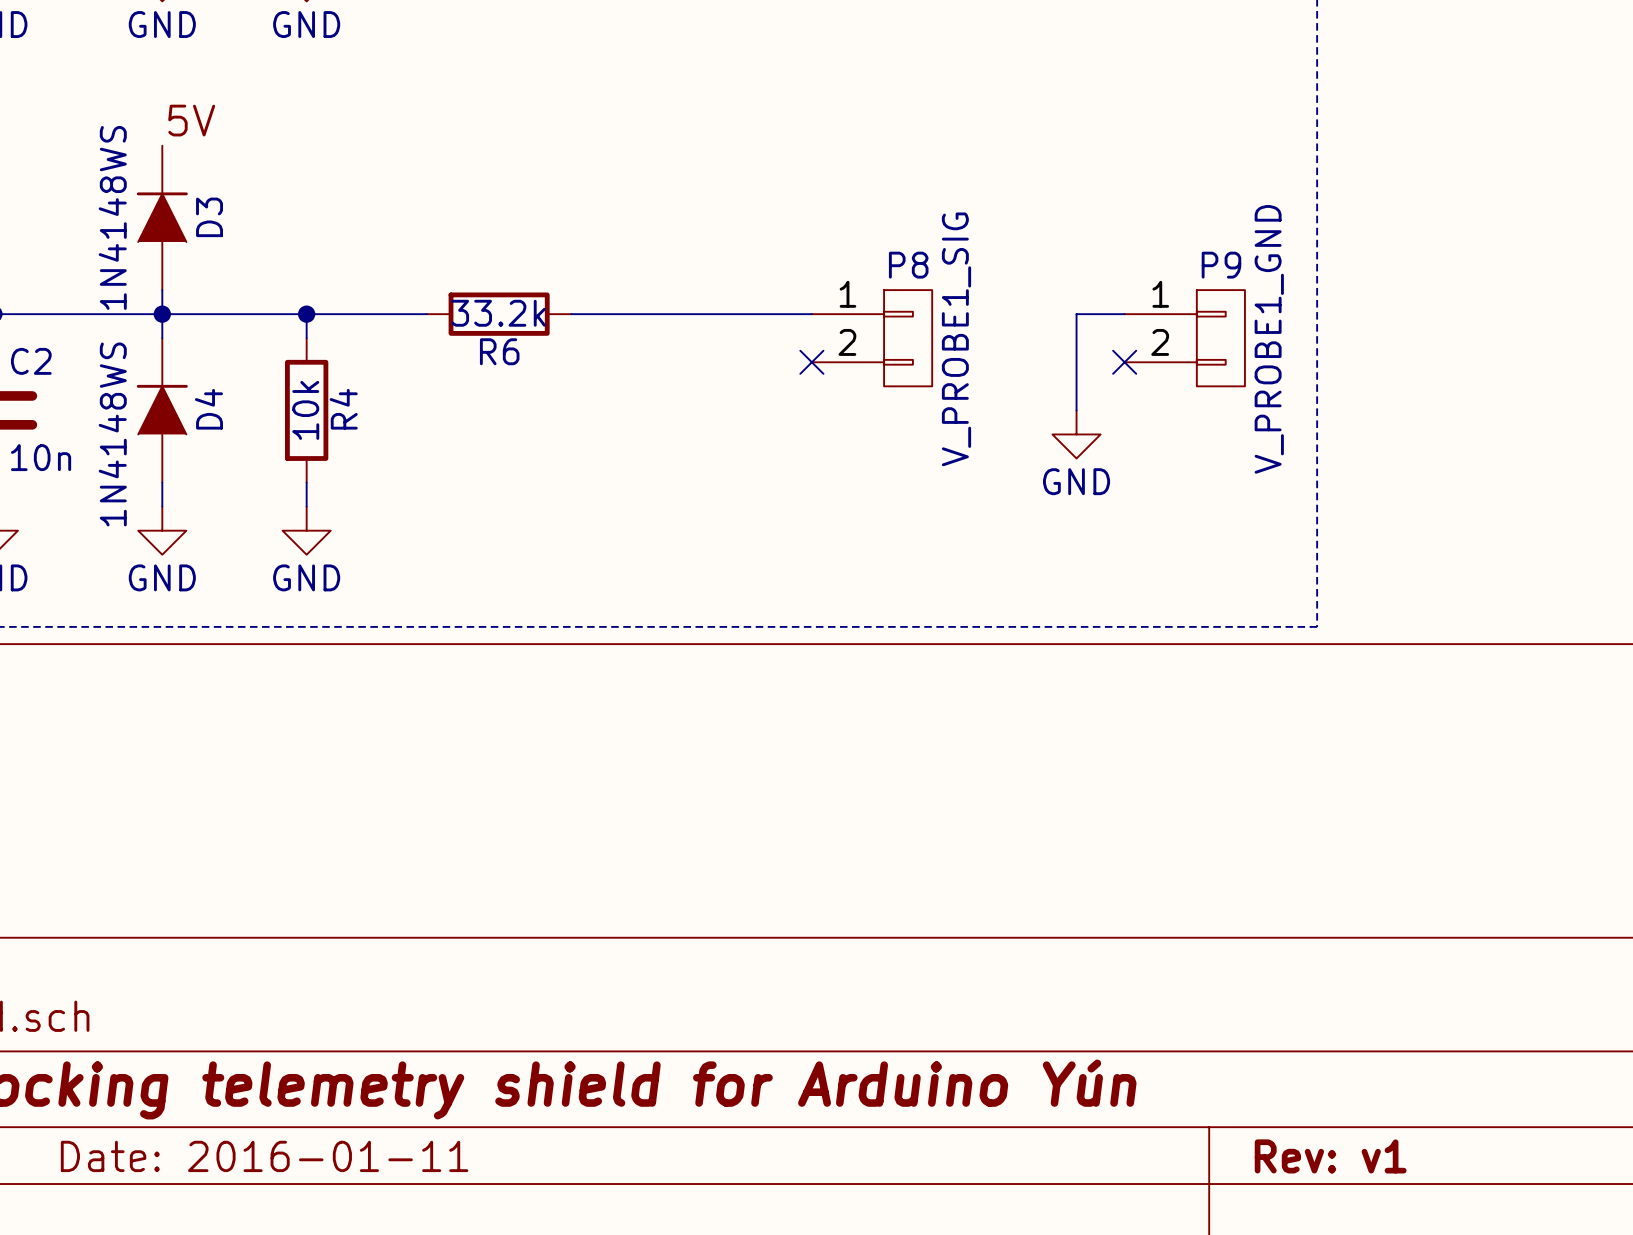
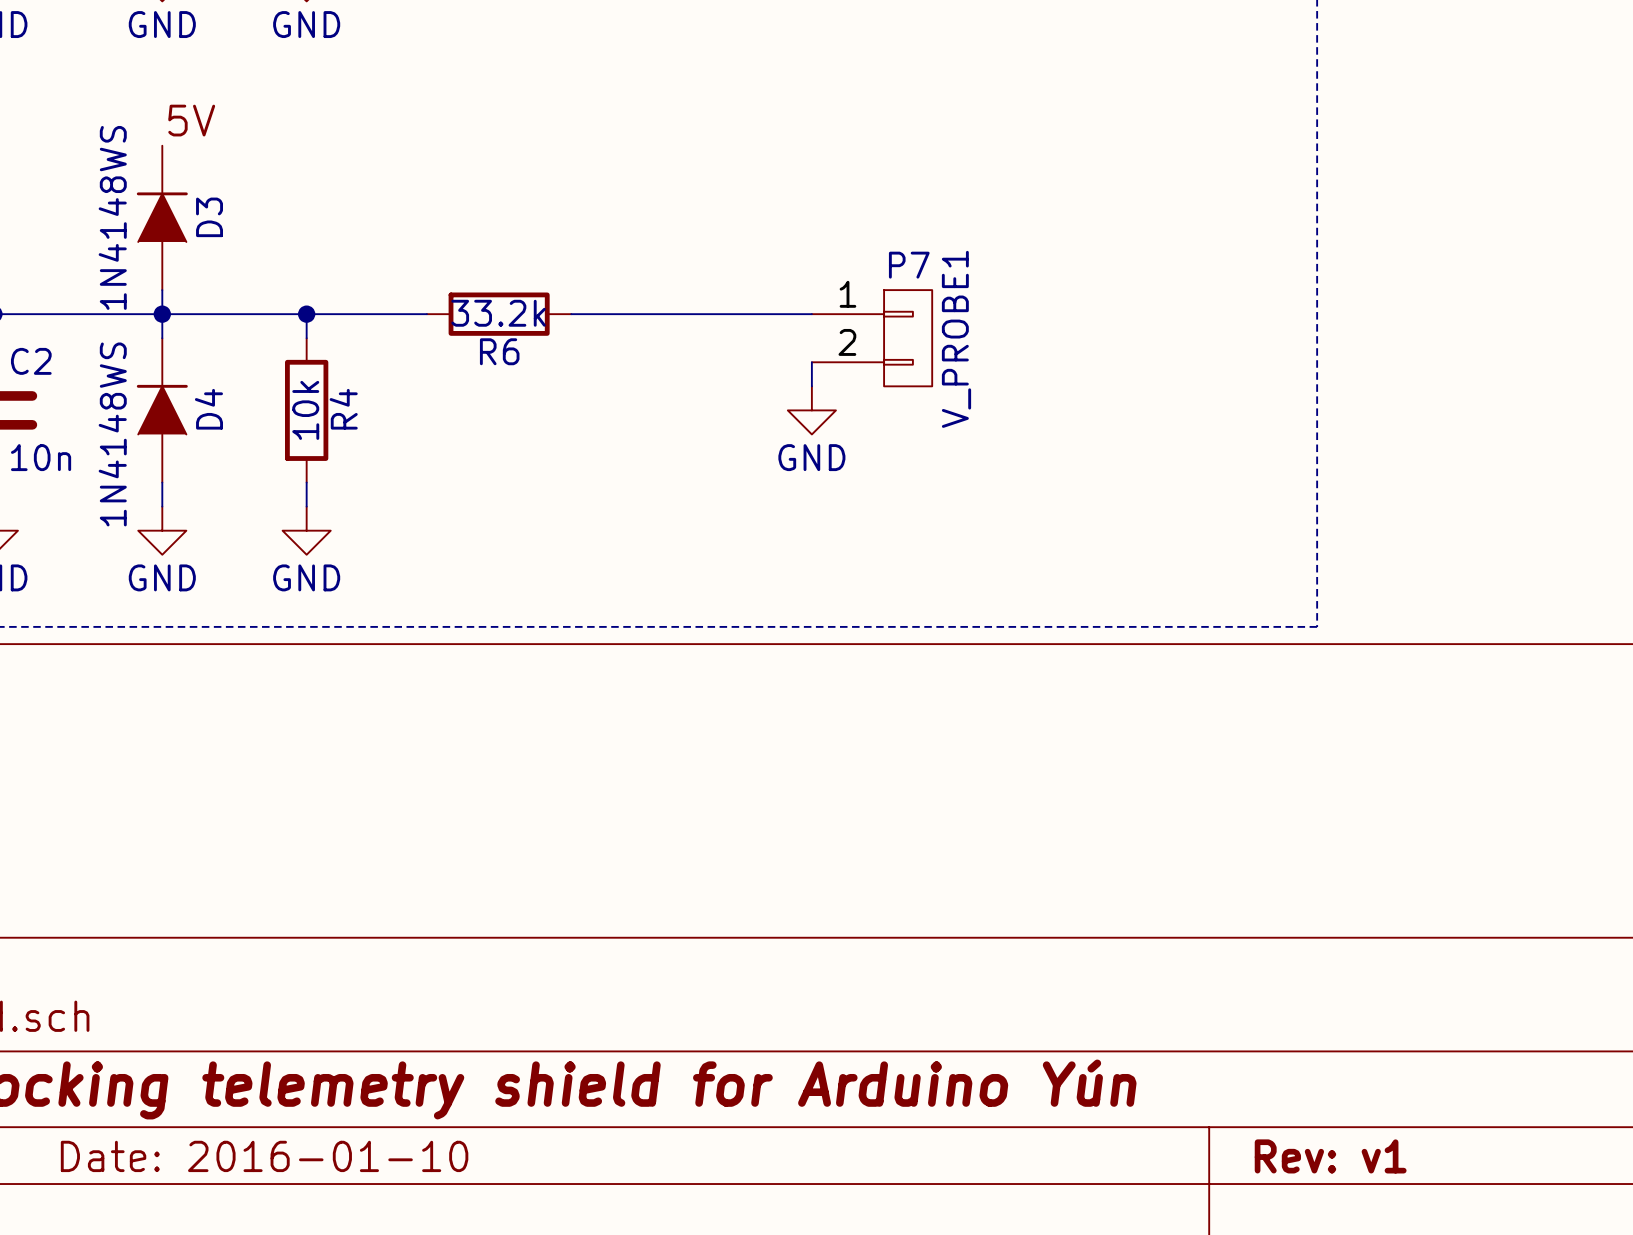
P8 name: P8 (908, 265) -> P7 (909, 265)
wire: (1124, 314) (1076, 314) (1076, 410) -> none
P9: V_PROBE1_GND (1184, 338) -> none
P8 value: V_PROBE1_SIG (956, 339) -> V_PROBE1 (956, 339)
wire: none -> (811, 362) (811, 386)
no-connect mark: (811, 362) -> none
no-connect mark: (1124, 362) -> none
power symbol position: GND (1076, 434) -> GND (811, 410)
title block: Date: 2016-01-11 (264, 1156) -> Date: 2016-01-10 (264, 1156)

